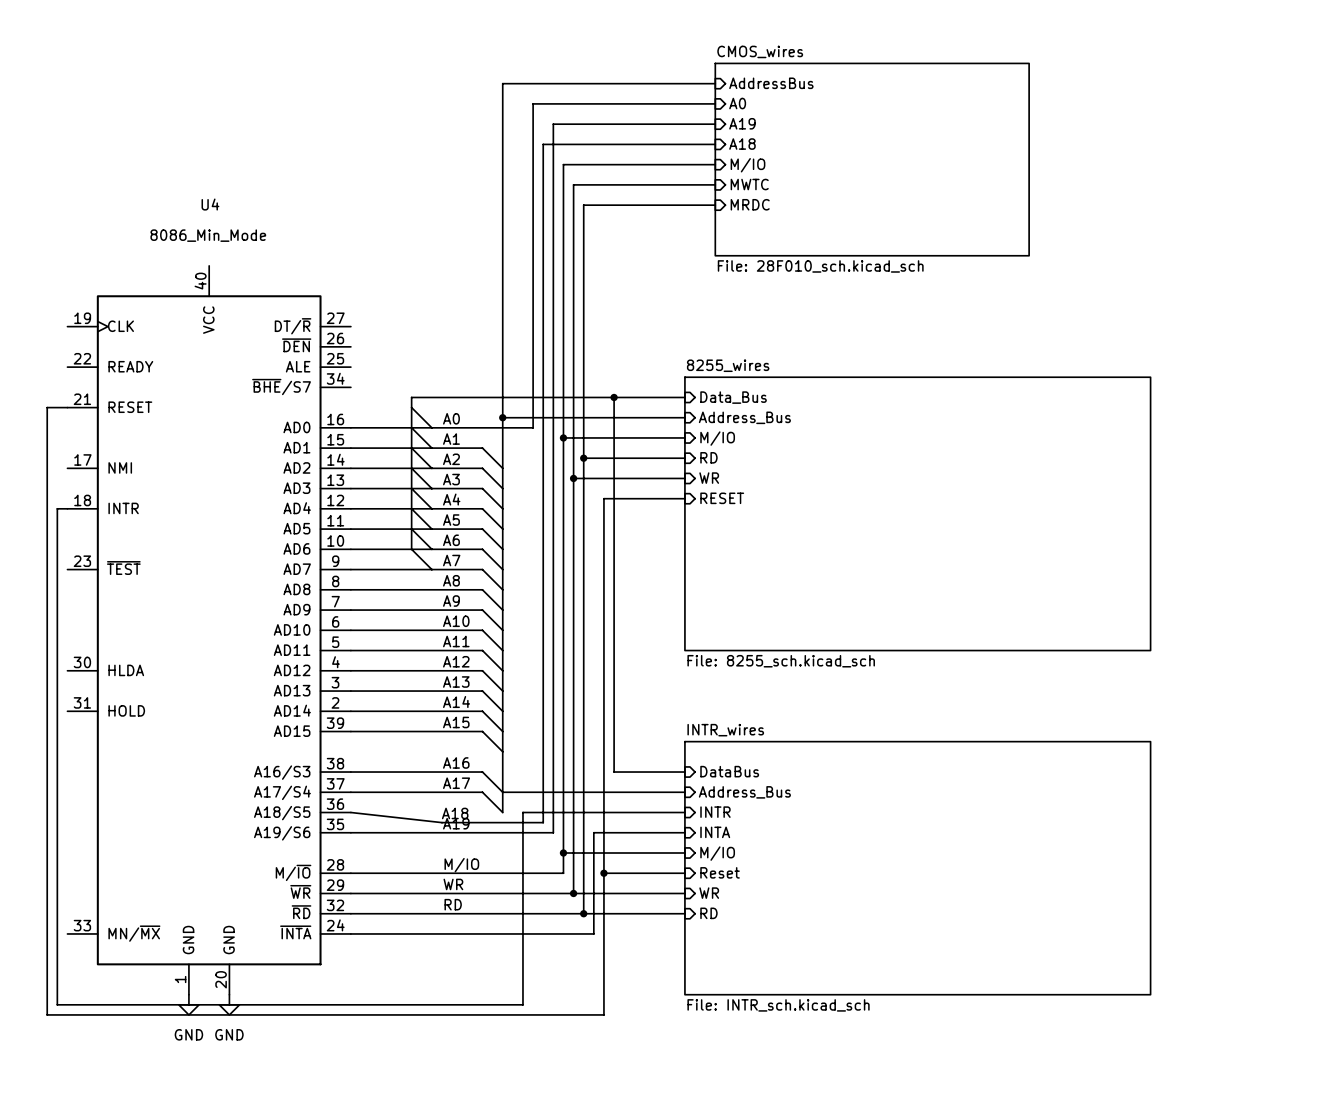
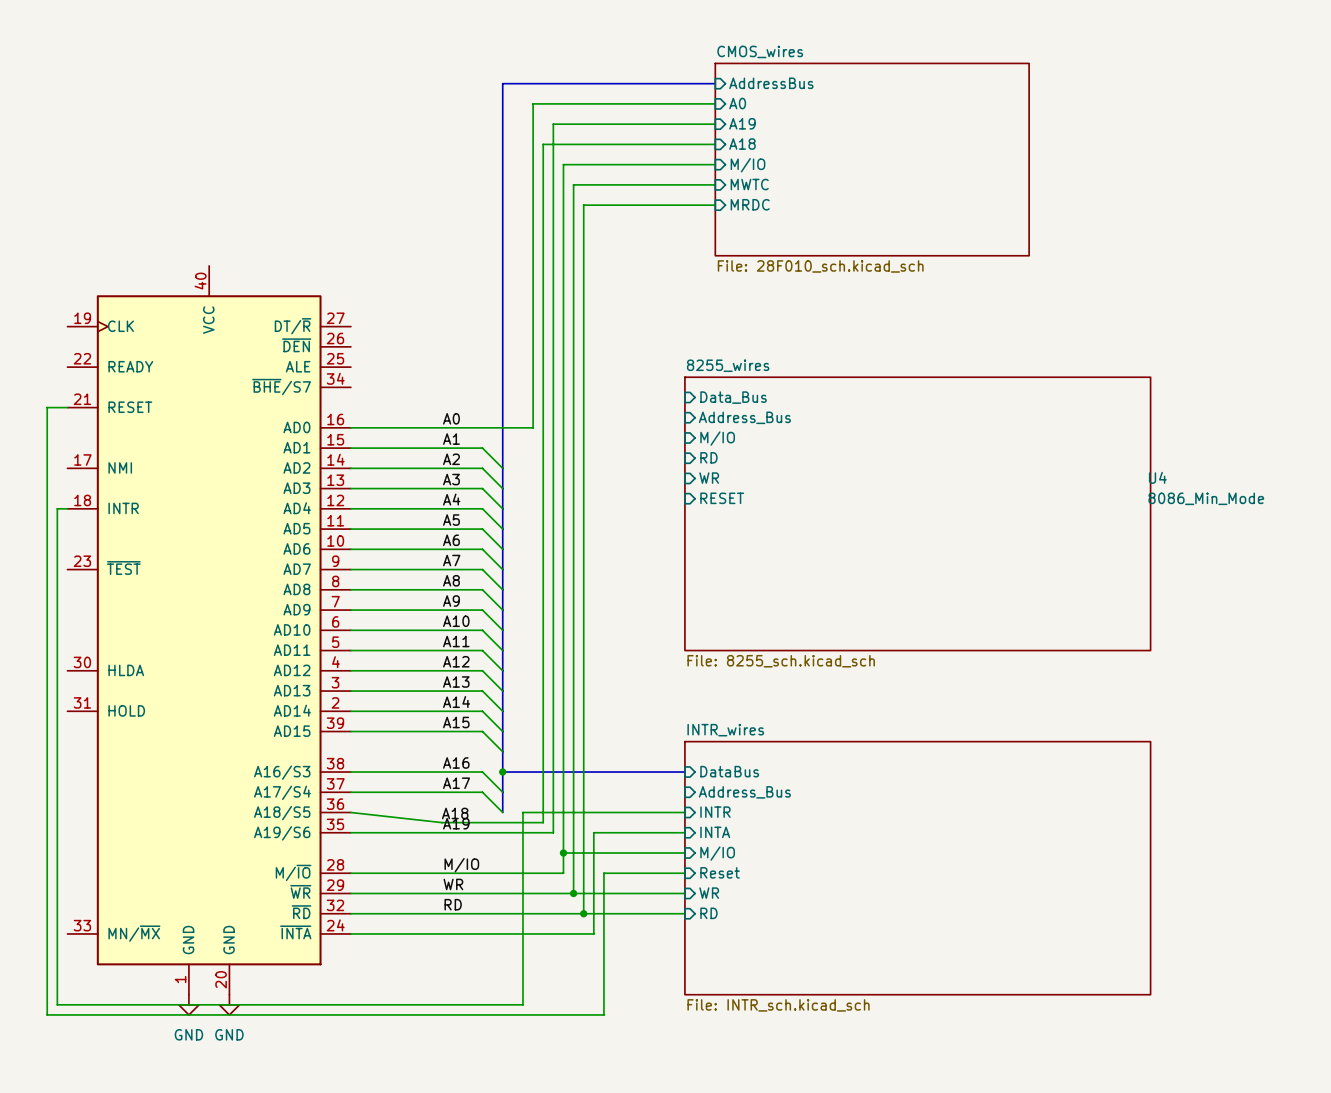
U4 name position: U4 (210, 204) -> U4 (1157, 477)
U4 value position: 8086_Min_Mode (208, 235) -> 8086_Min_Mode (1206, 498)
bus: (614, 397) (614, 772) -> (502, 772) (614, 772)
junction: (614, 397) -> none
bus: (684, 397) (411, 397) (411, 549) -> none
wire: (411, 407) (431, 427) -> none
bus: (502, 417) (684, 417) -> none
junction: (502, 417) -> none
wire: (411, 427) (431, 448) -> none
wire: (563, 437) (684, 437) -> none
junction: (563, 437) -> none
wire: (411, 448) (431, 468) -> none
wire: (583, 458) (684, 458) -> none
junction: (583, 458) -> none
wire: (411, 468) (431, 488) -> none
wire: (573, 478) (684, 478) -> none
junction: (573, 478) -> none
wire: (411, 488) (431, 508) -> none
wire: (684, 498) (603, 498) (603, 873) -> none
wire: (411, 508) (431, 529) -> none
wire: (411, 529) (431, 549) -> none
wire: (411, 549) (431, 569) -> none
junction: none -> (502, 772)
bus: (502, 792) (684, 792) -> none
junction: (603, 873) -> none

